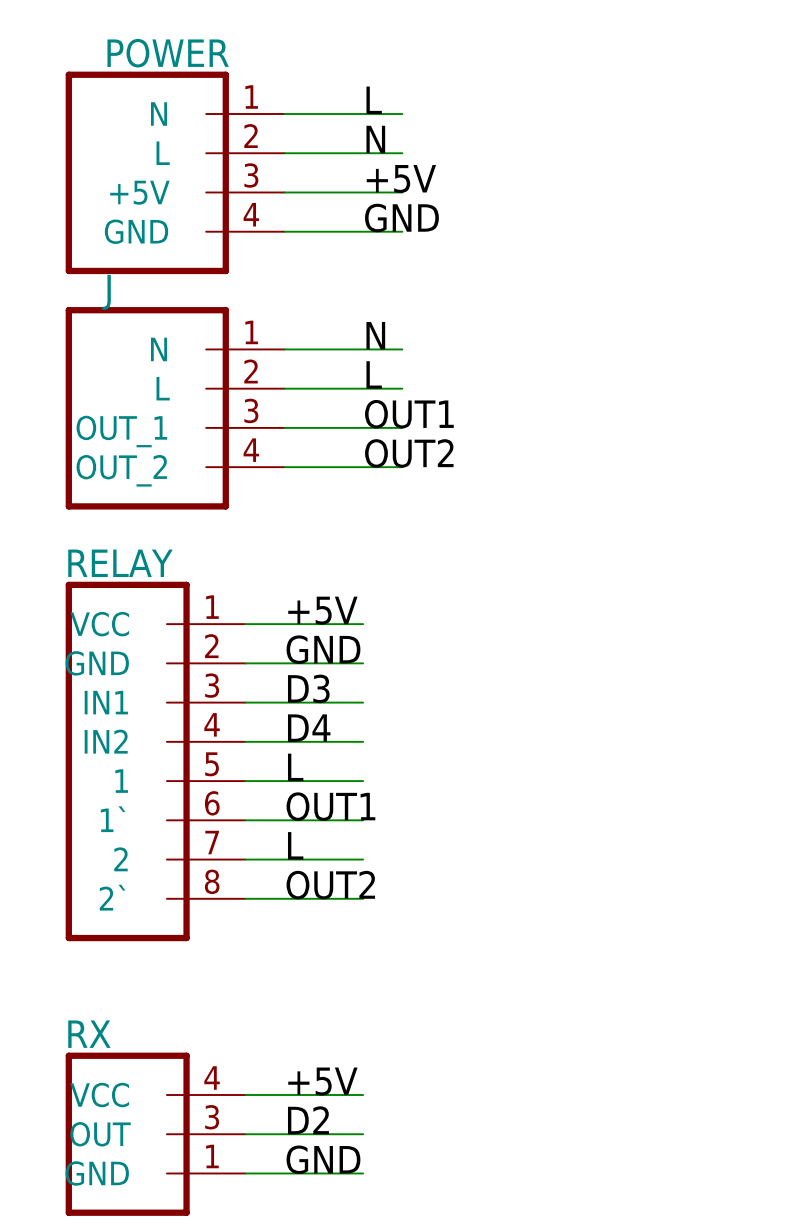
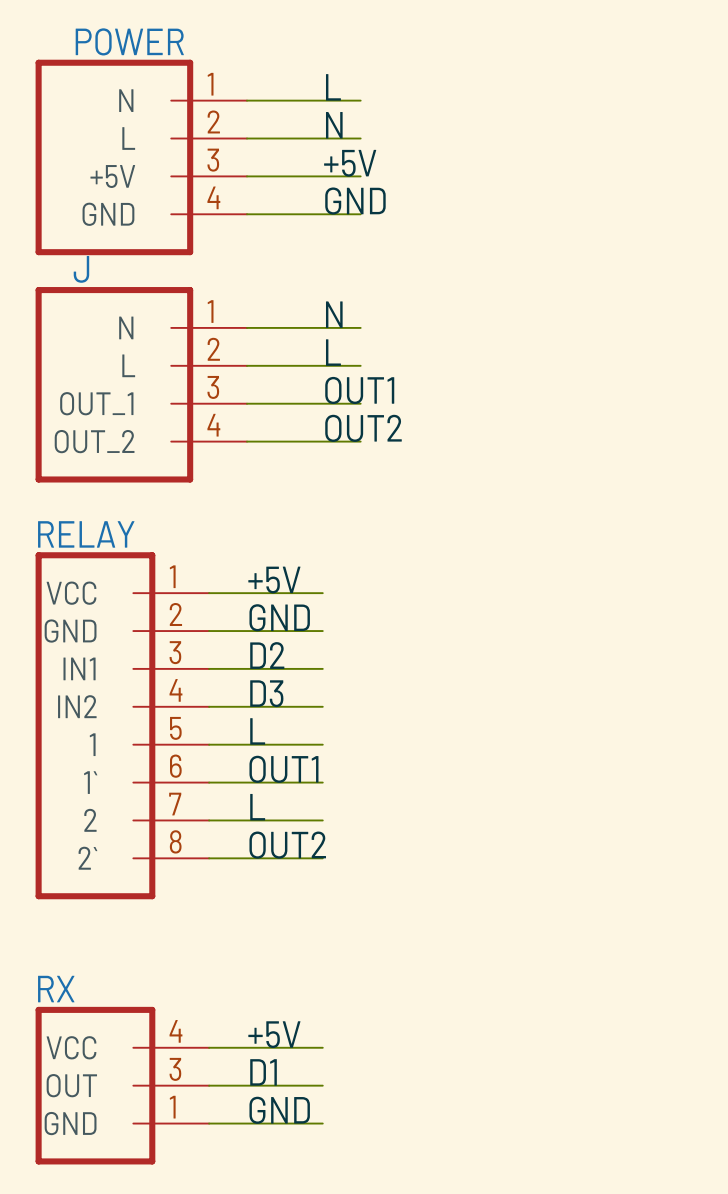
label: D3 (308, 688) -> D2 (267, 655)
label: D4 (309, 728) -> D3 (266, 693)
label: D2 (308, 1120) -> D1 (263, 1072)

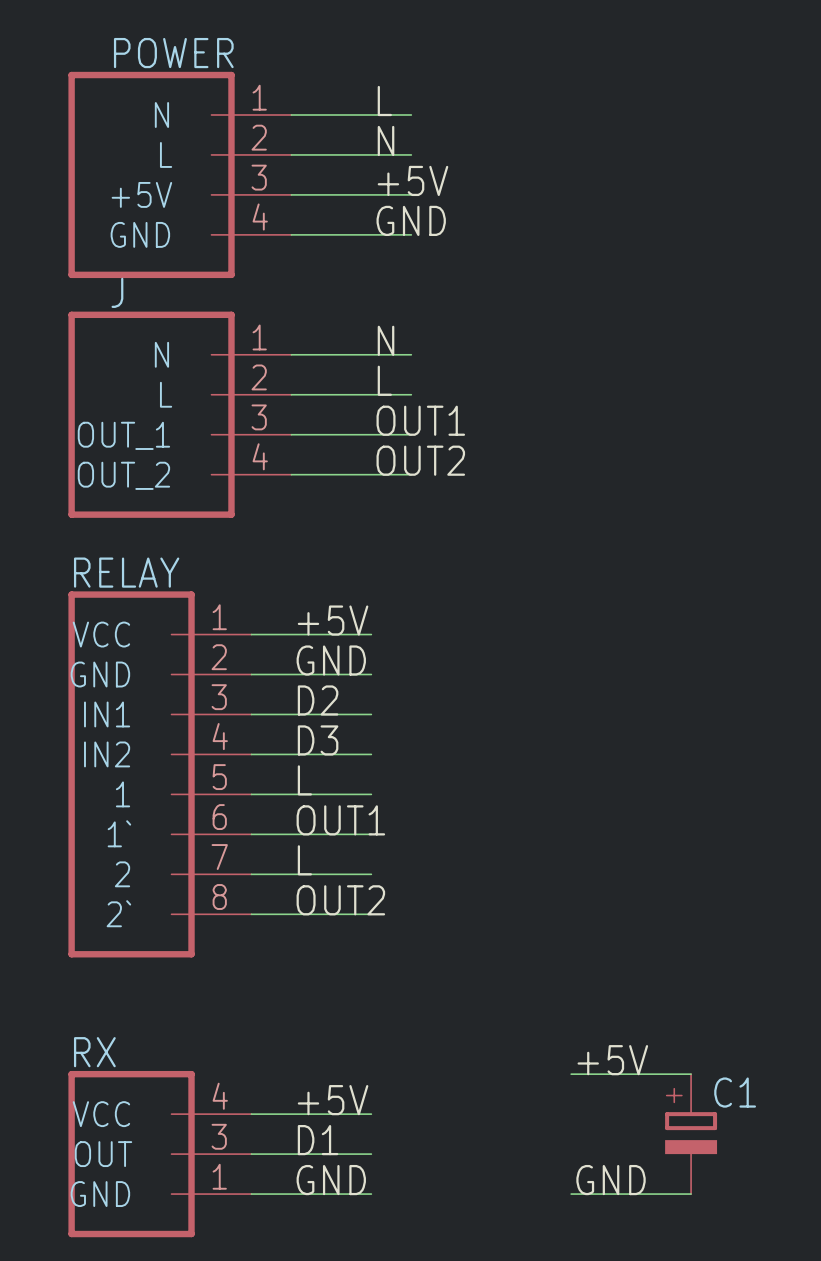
label: none -> +5V (612, 1060)
wire: none -> (571, 1074) (691, 1074)
C1: none -> (691, 1134)
label: none -> GND (611, 1180)
wire: none -> (571, 1194) (691, 1194)

